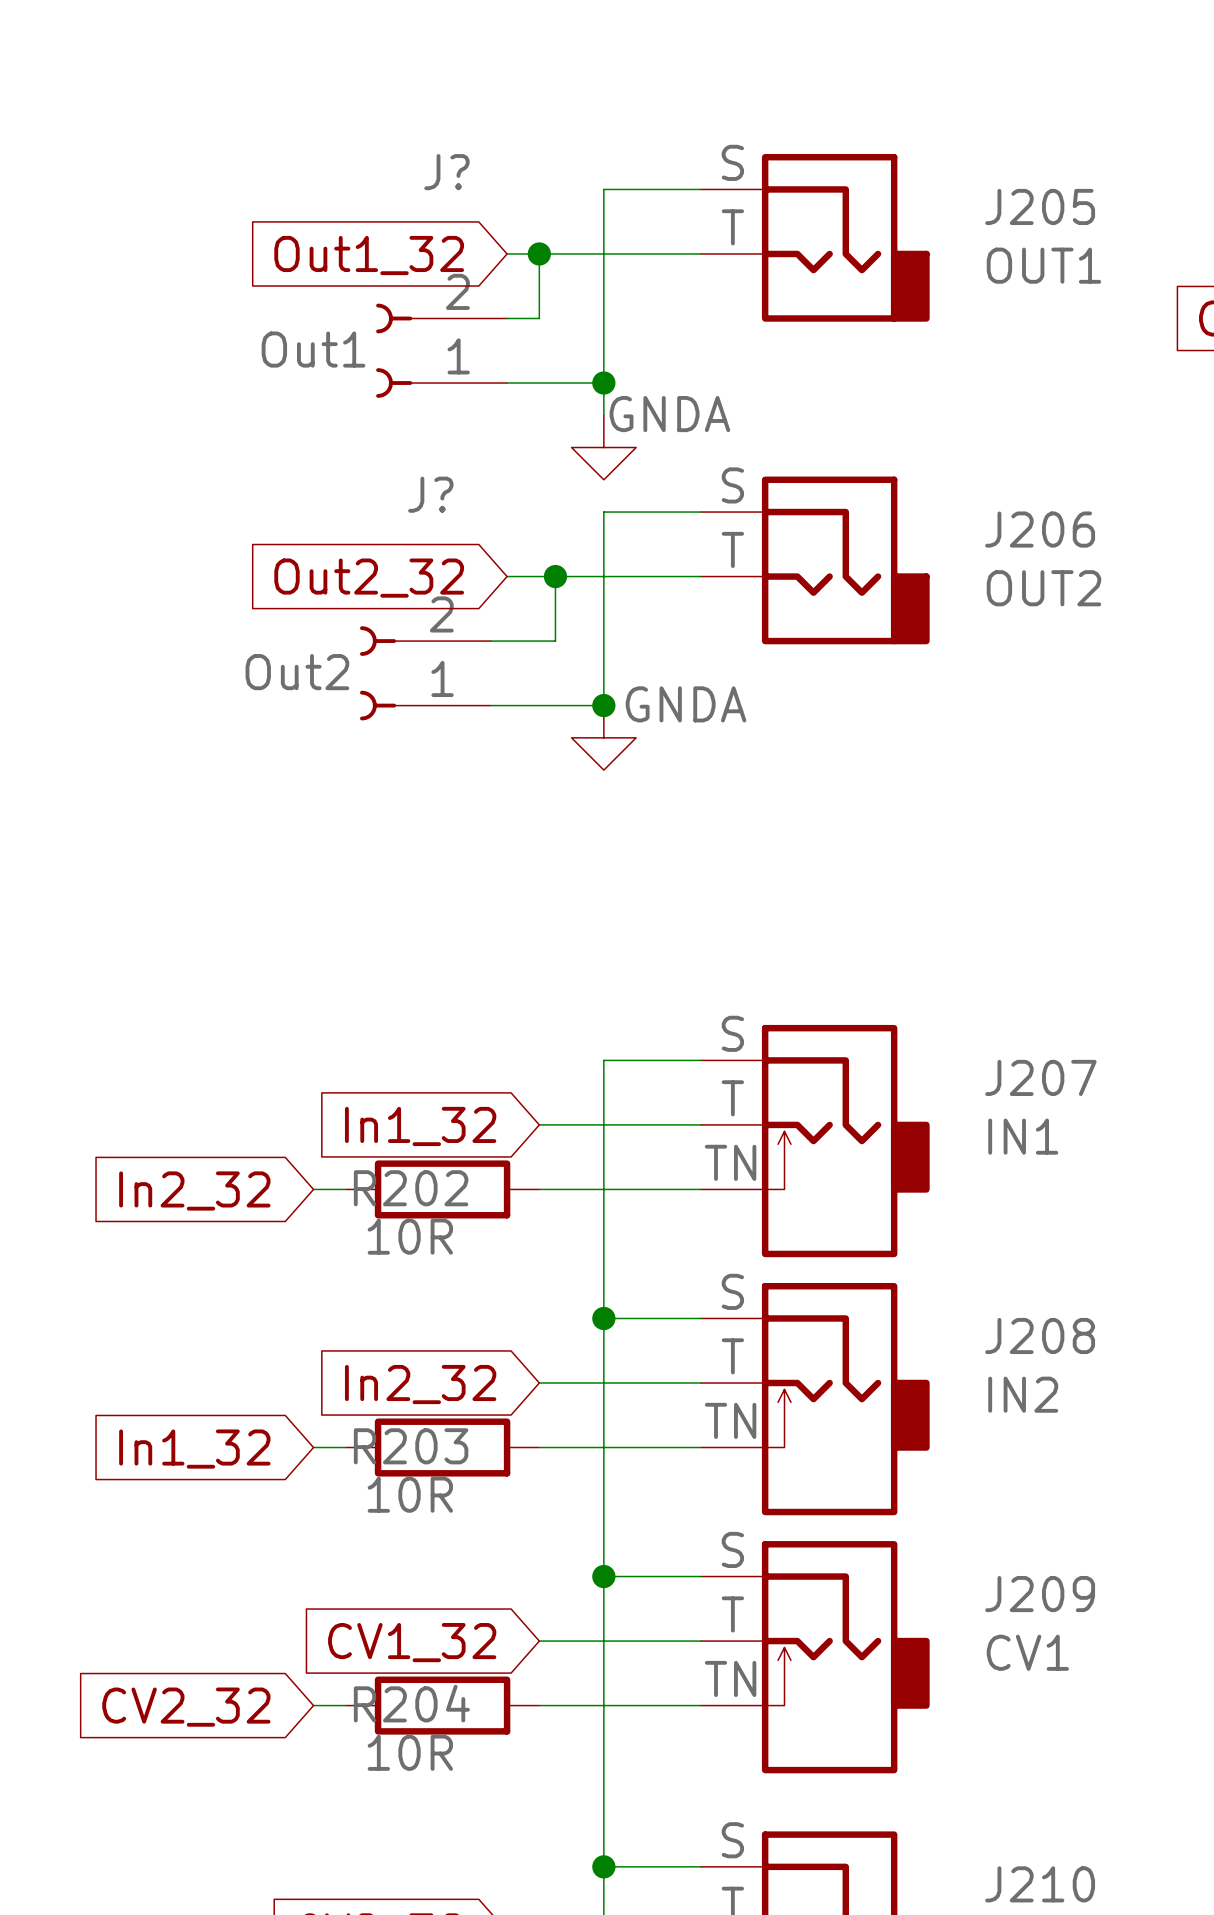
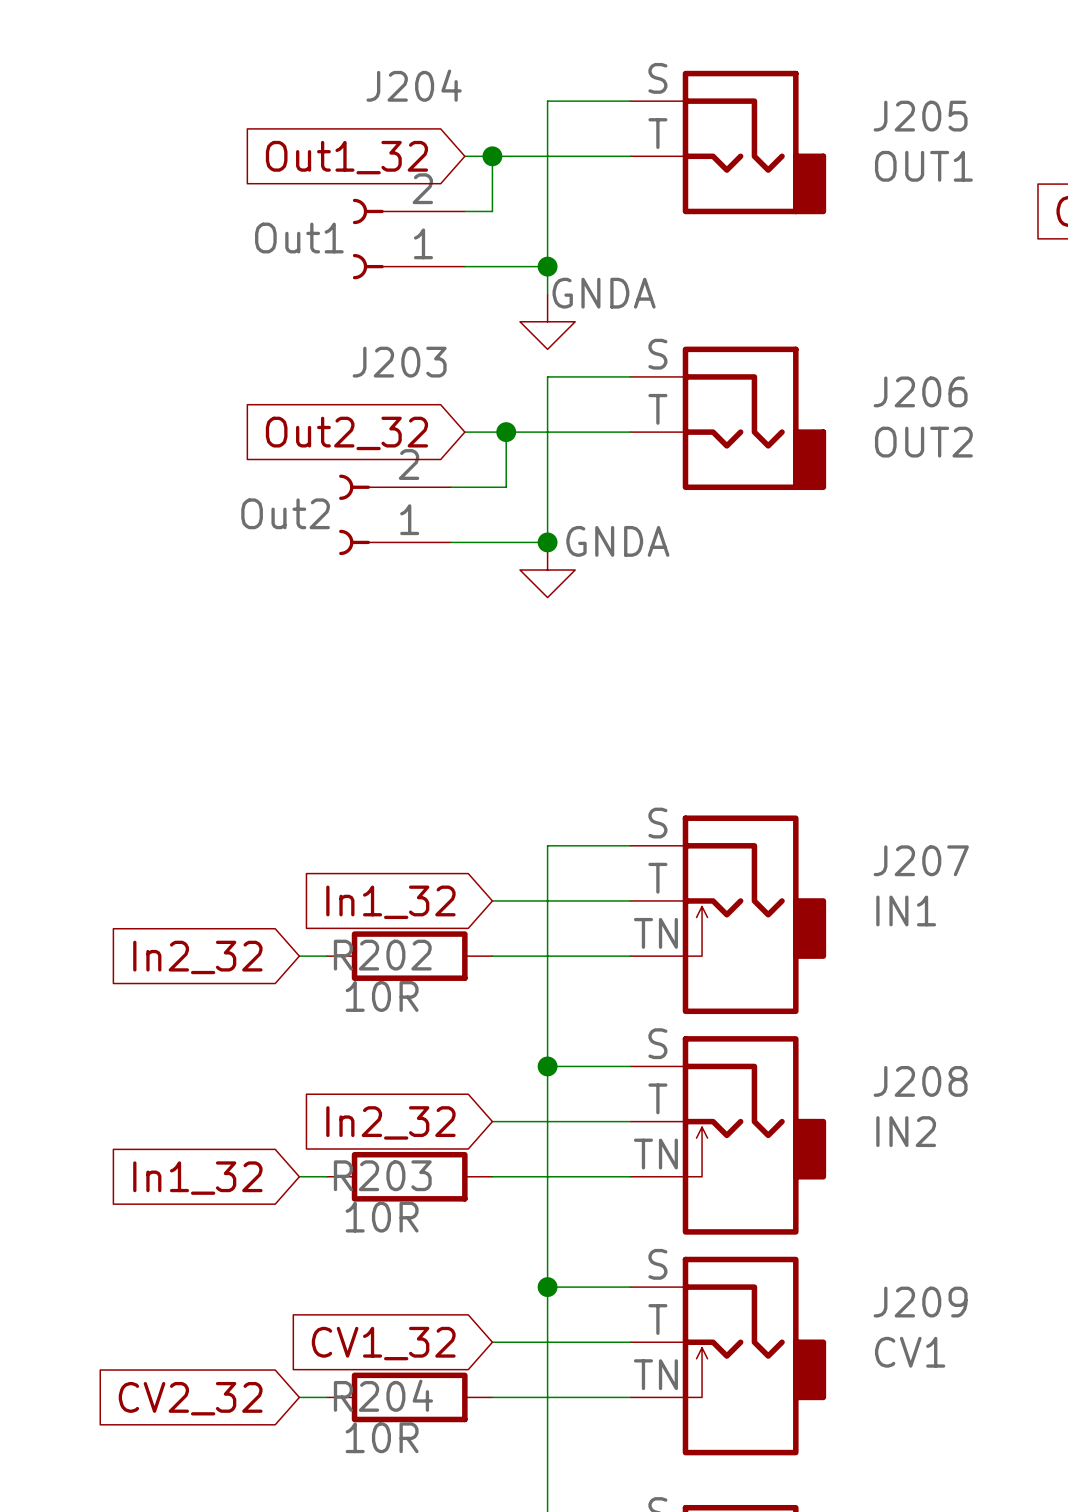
J? name: J? (446, 172) -> J204 (414, 85)
J? name: J? (430, 494) -> J203 (399, 362)

